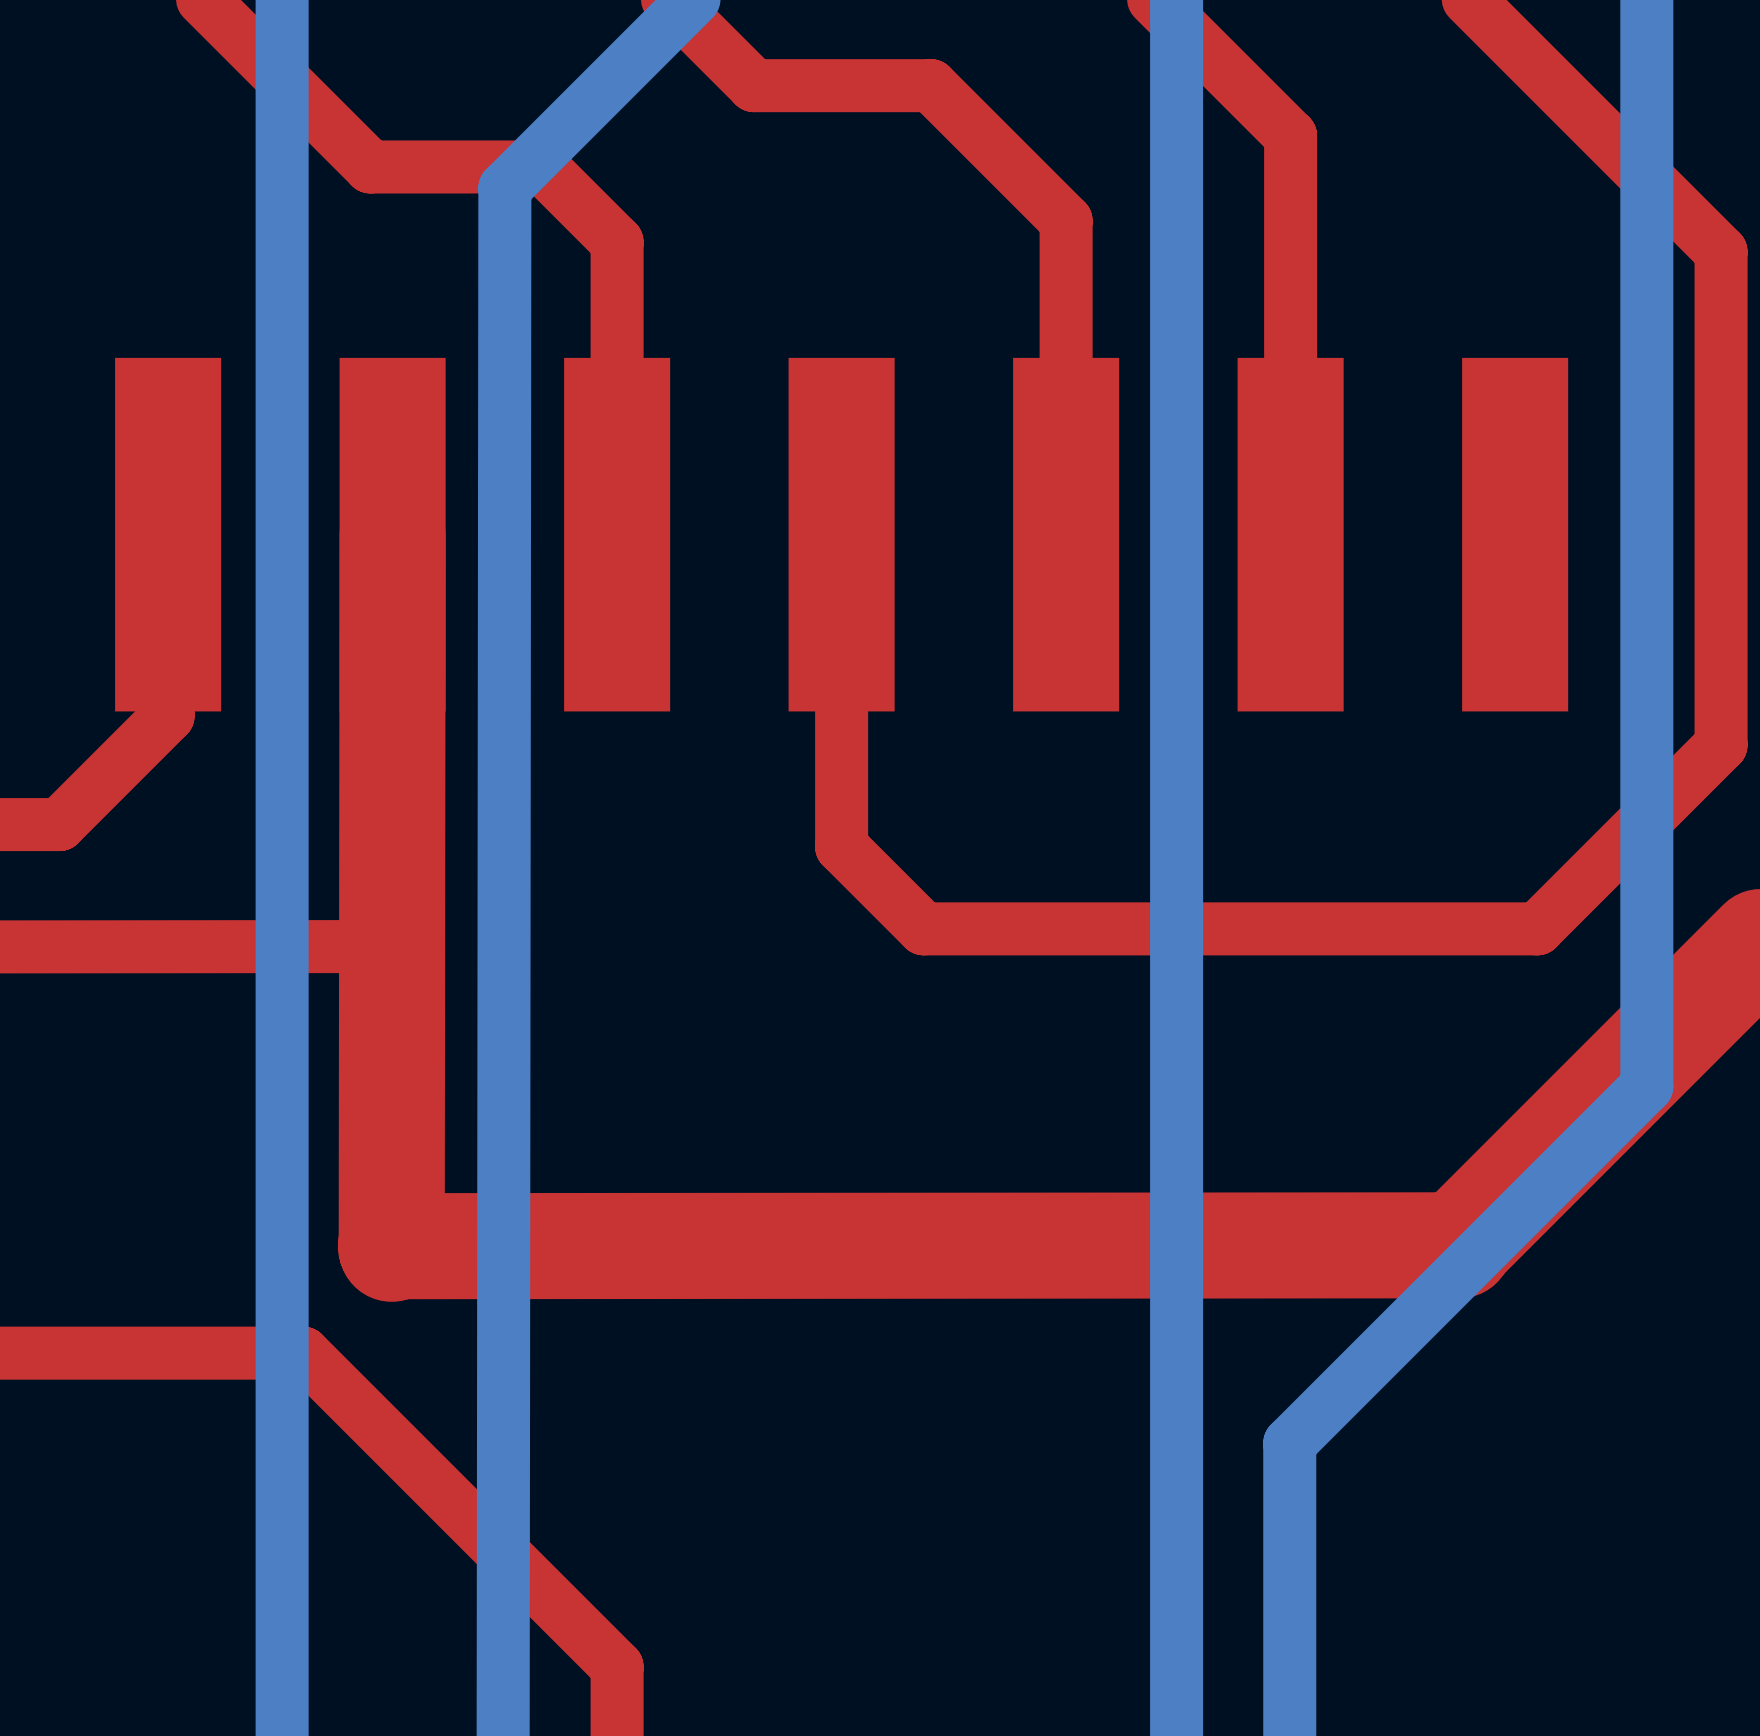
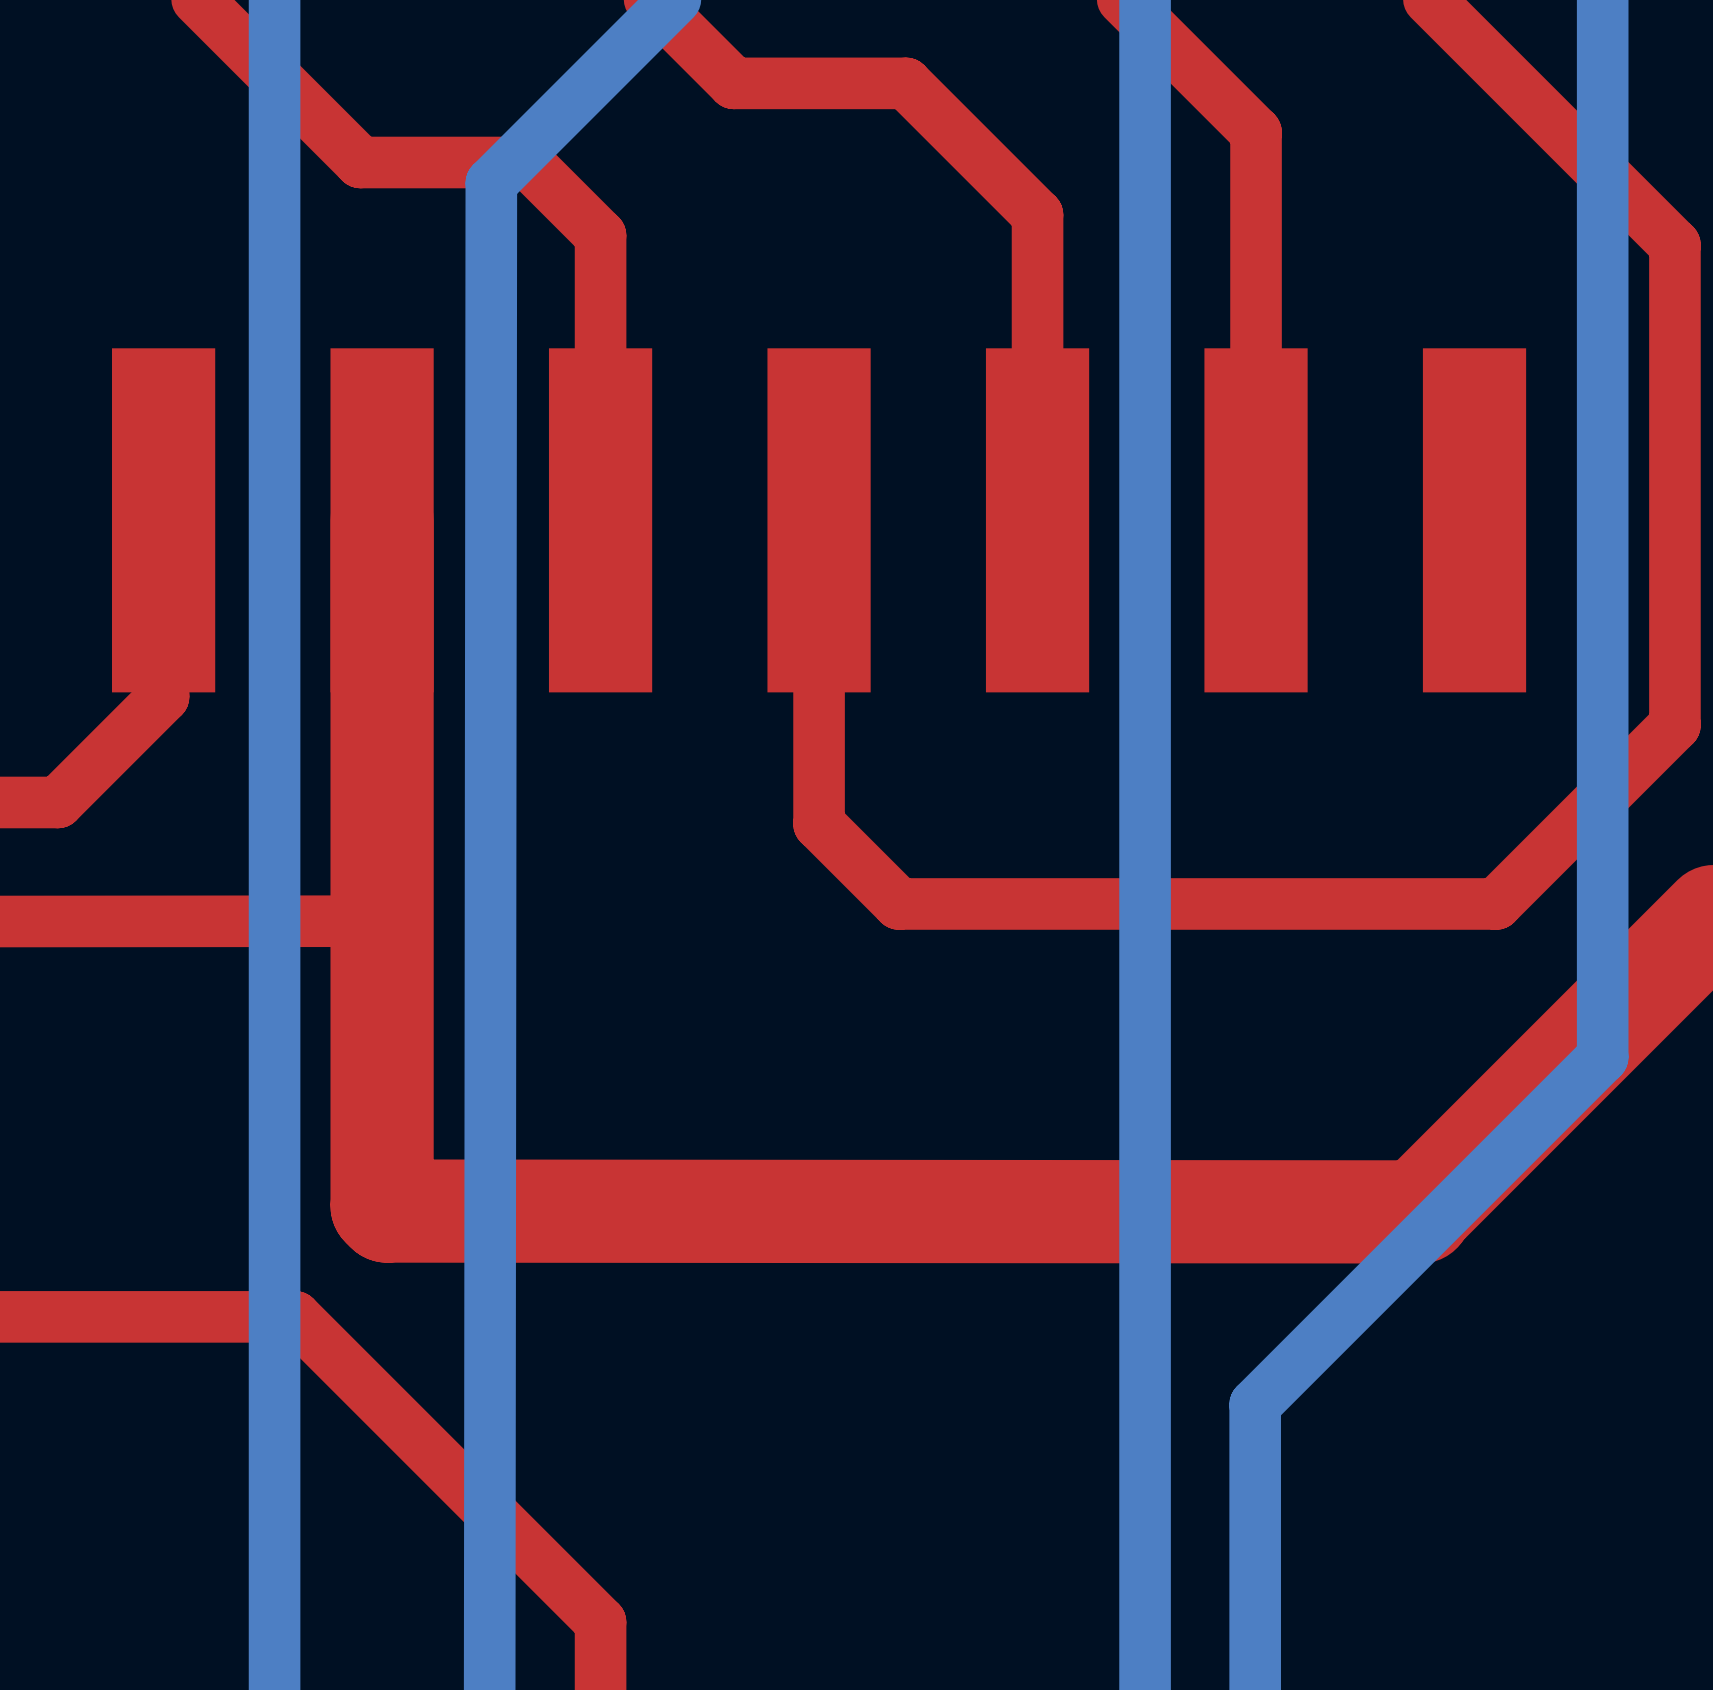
top track: (392, 534) (391, 1248) -> none
top track: (1459, 1245) (390, 1246) -> (1420, 1211) (387, 1211) (382, 1205) (382, 520)

